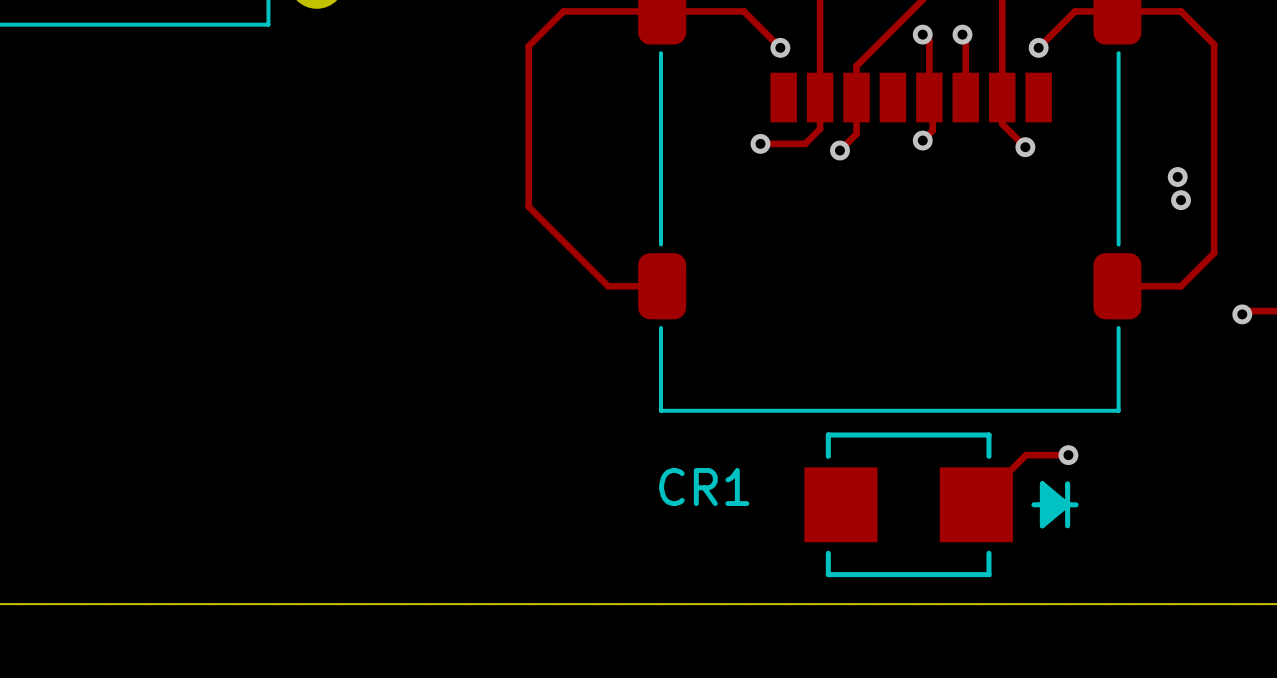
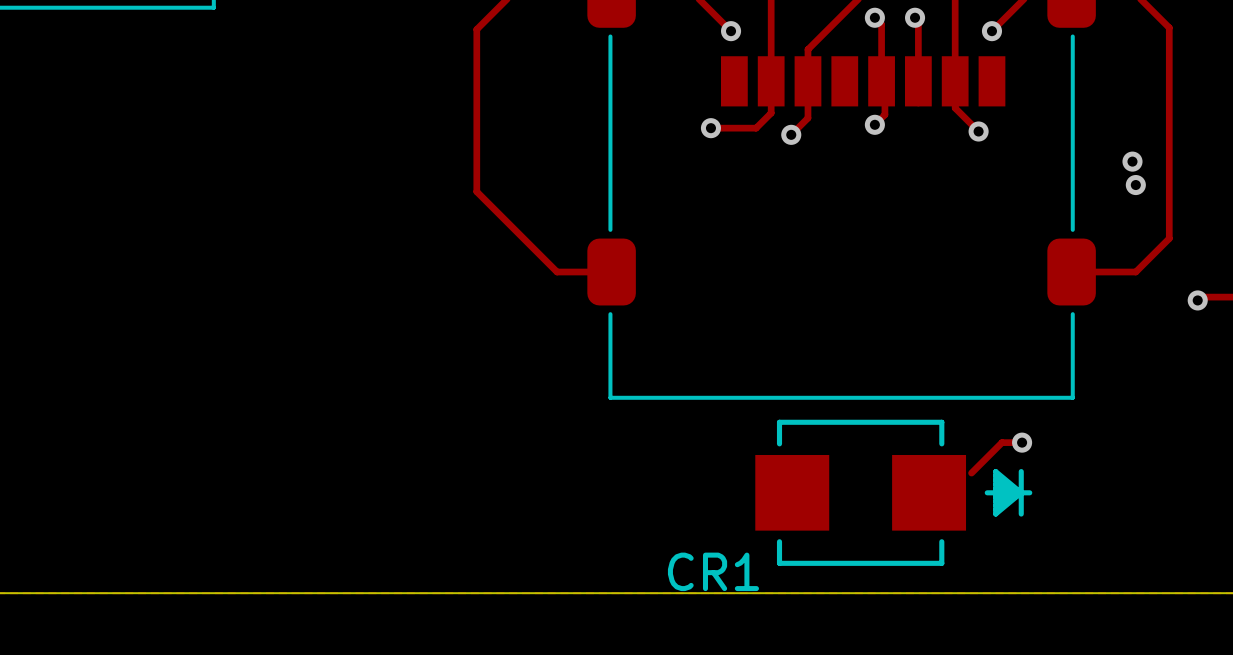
track: (1048, 455) (1026, 455) (976, 504) -> (1002, 442) (971, 473)
CR1 name position: CR1 (704, 487) -> CR1 (713, 571)

